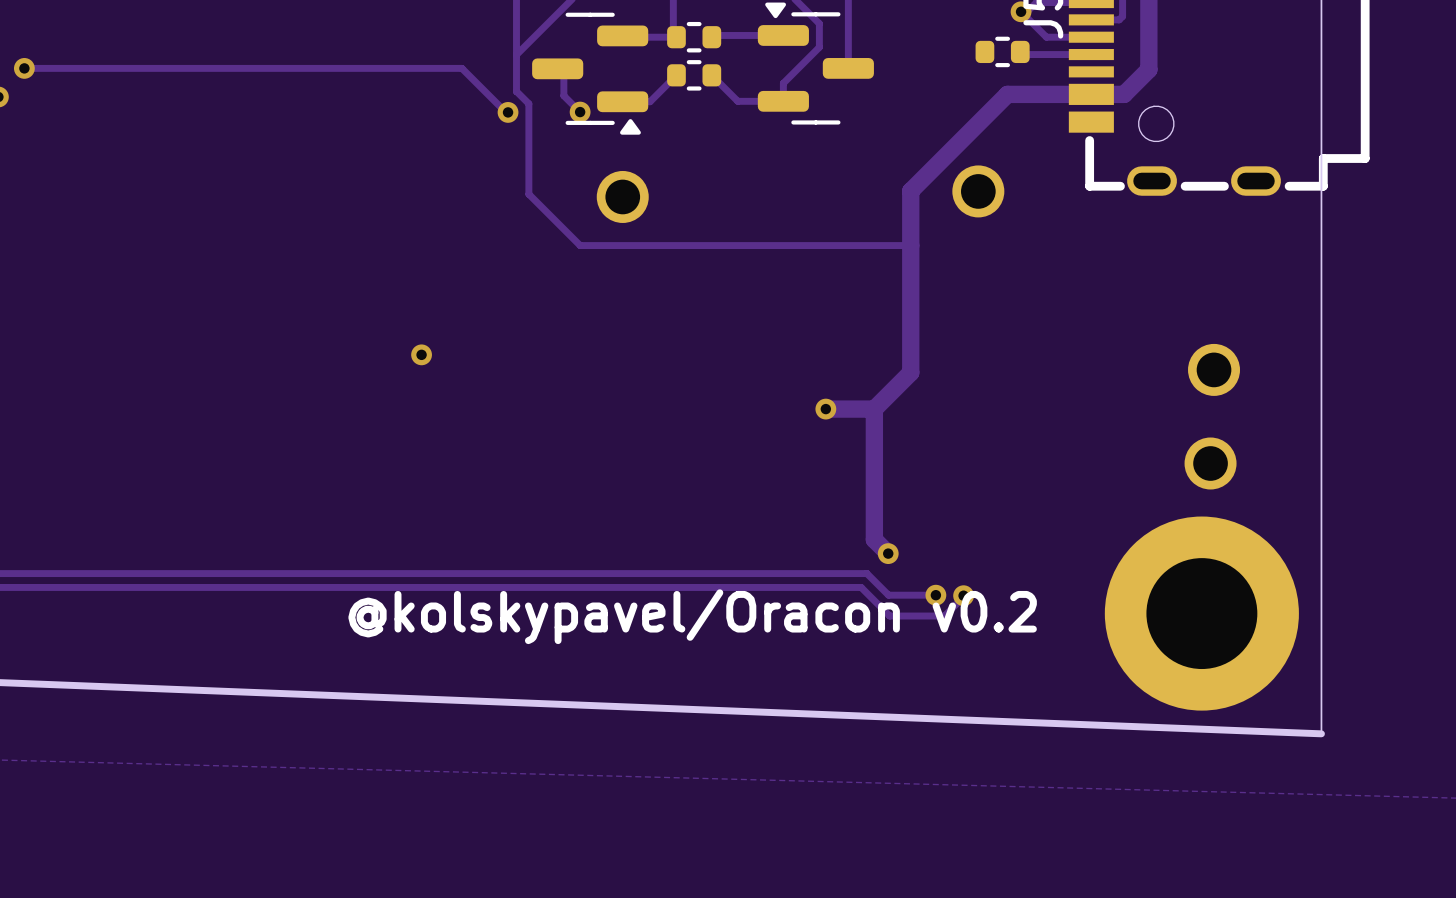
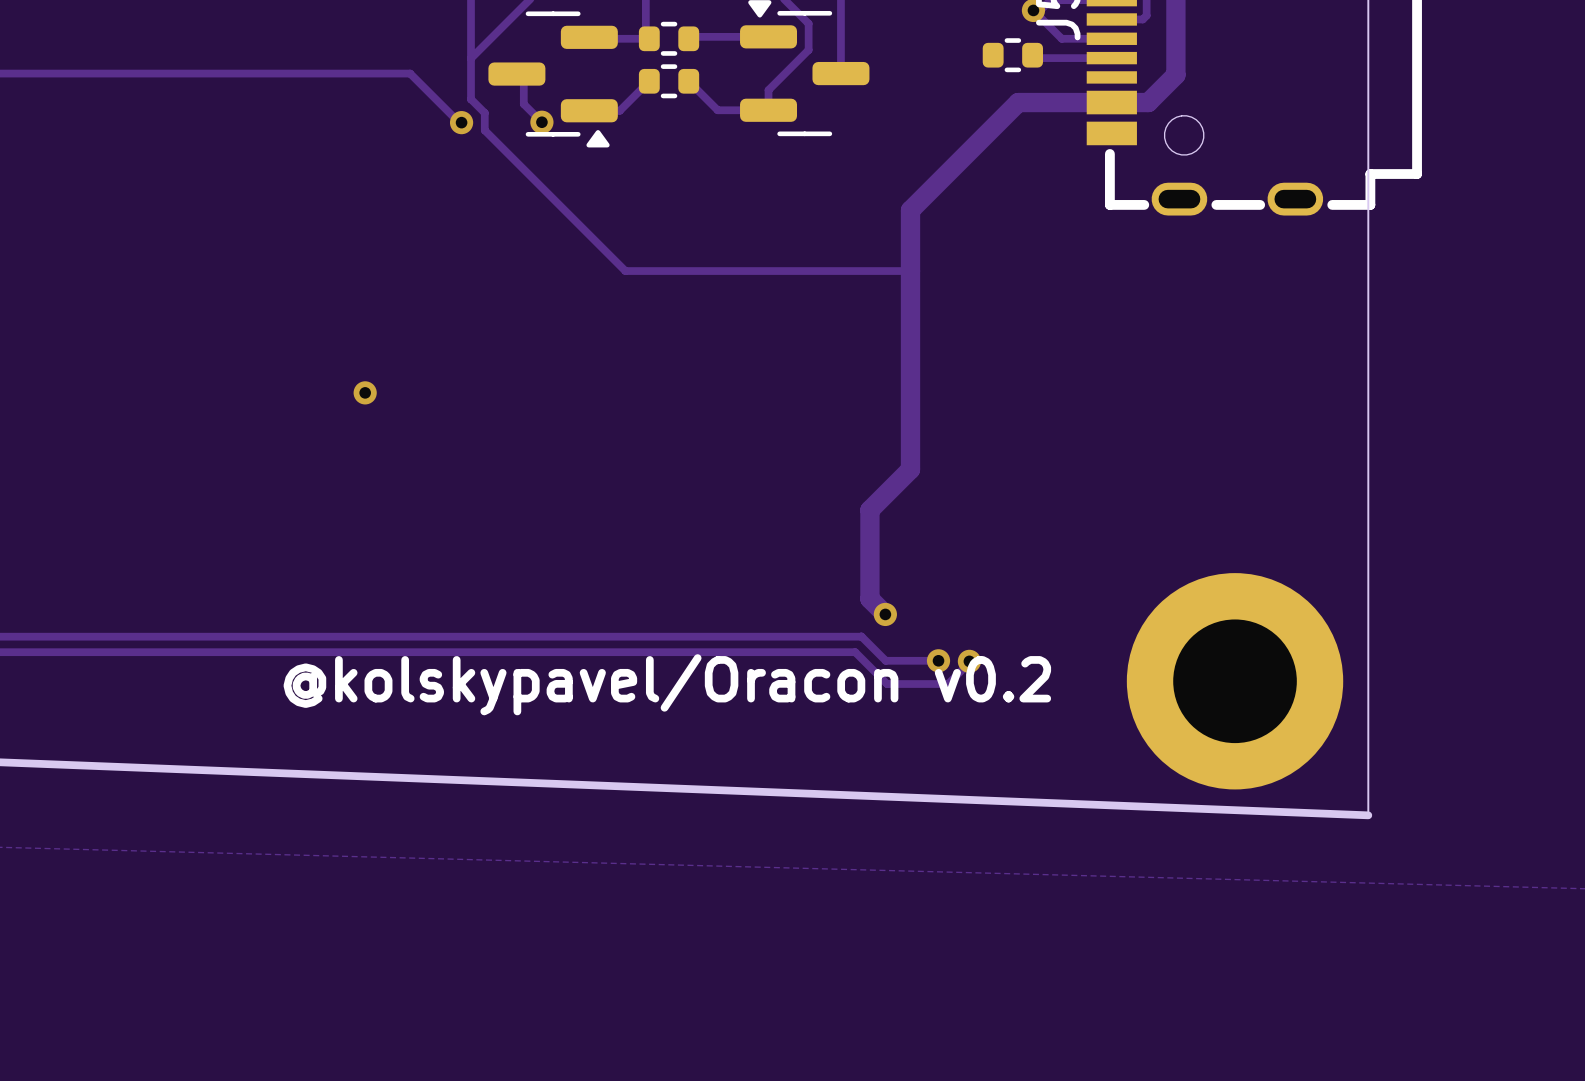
track: (528, 119) (528, 194) (580, 245) (655, 245) -> (484, 130) (625, 271)
part: (978, 191) -> none
part: (622, 196) -> none
part: (1214, 369) -> none
track: (910, 372) (874, 409) -> (910, 412) (910, 469) (869, 510)
track: (825, 409) (874, 409) -> none
via: (825, 409) -> none
track: (874, 409) (874, 460) -> none
part: (1210, 463) -> none

